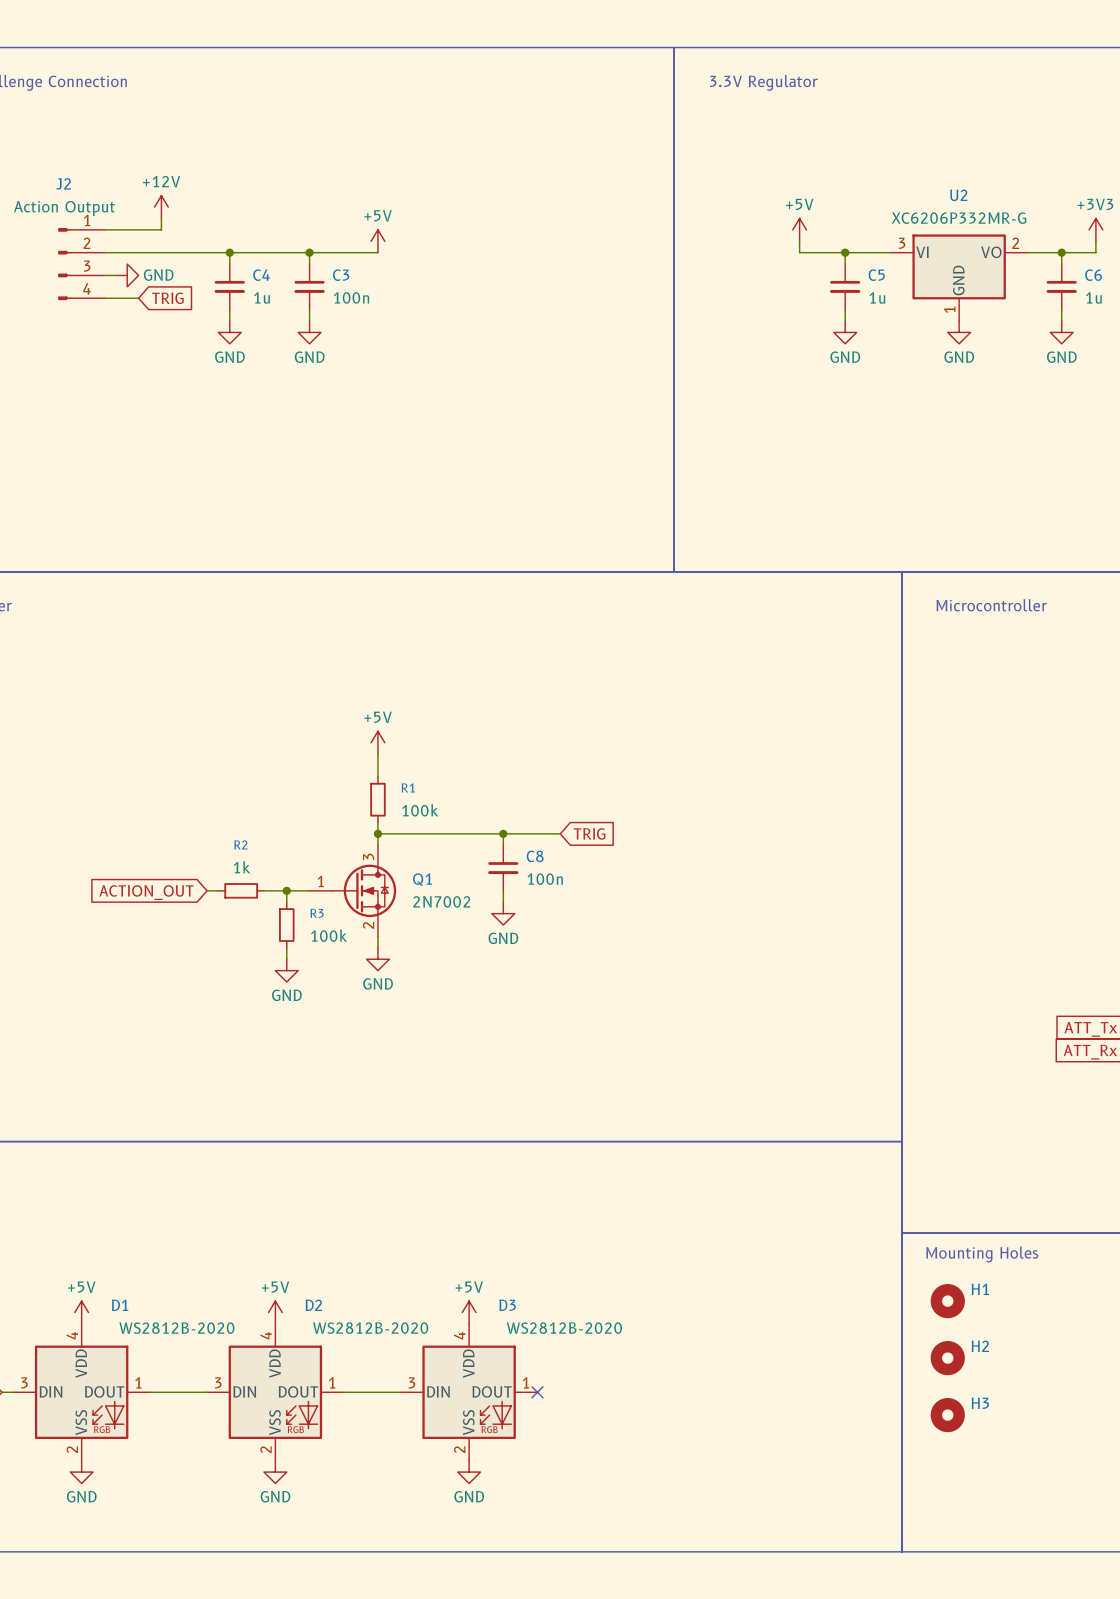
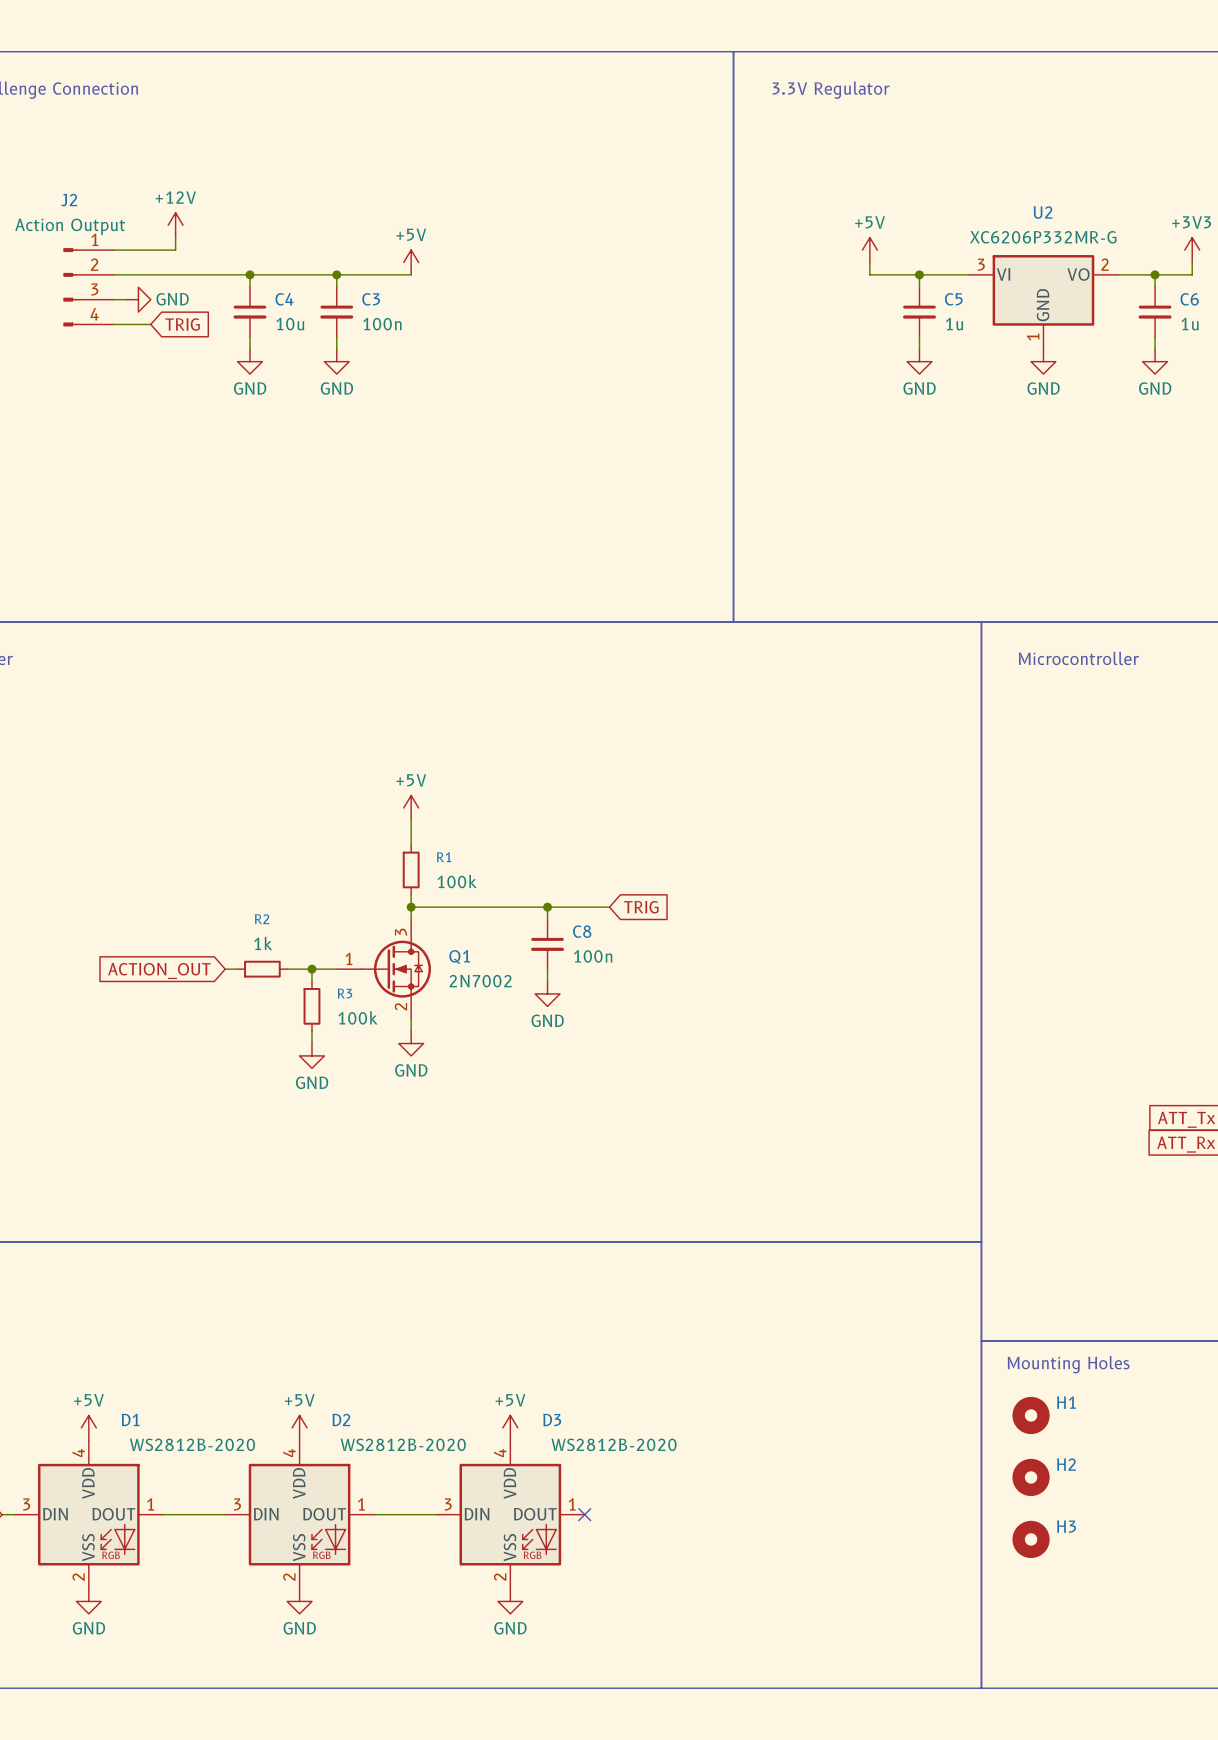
C4 value: 1u (261, 297) -> 10u (290, 324)

